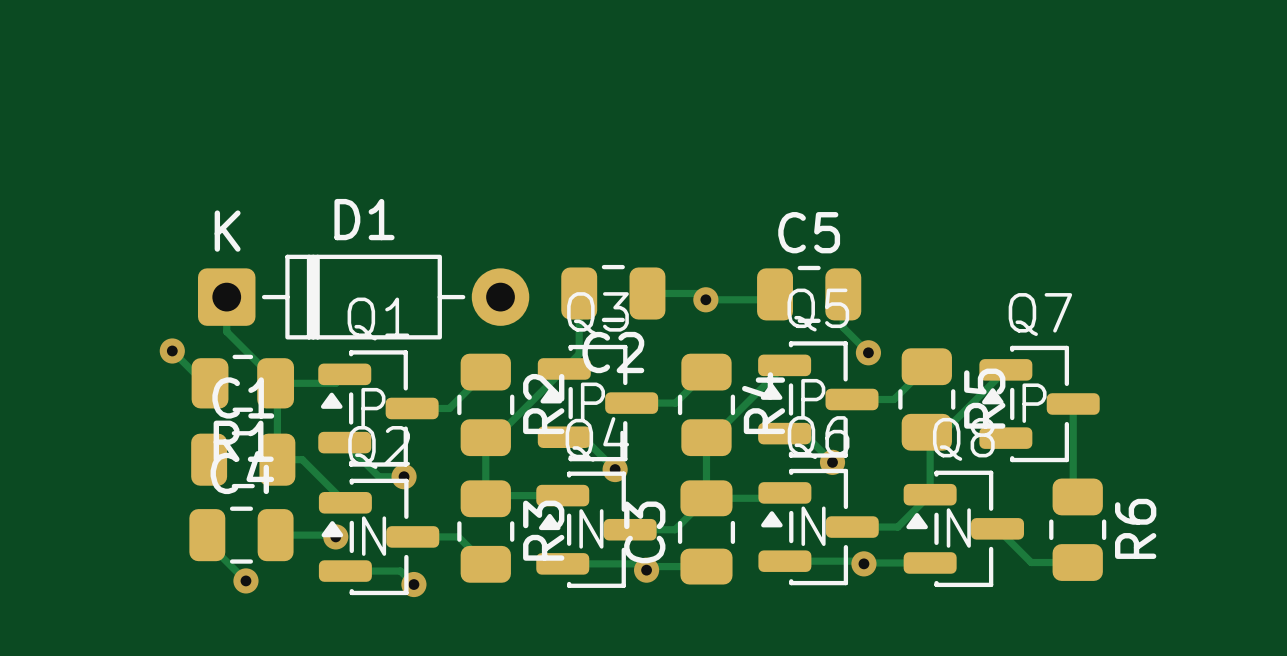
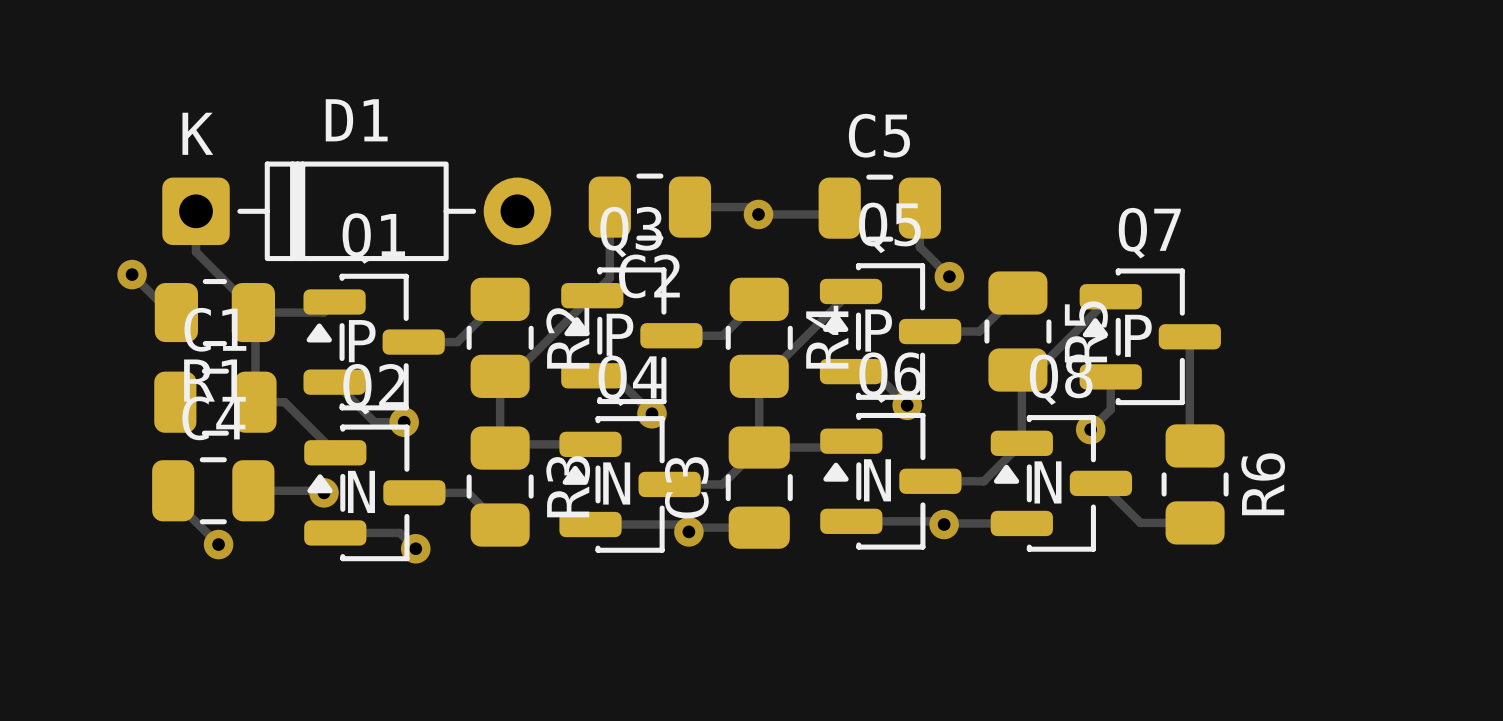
track: none -> (1110, 376) (1110, 409) (1090, 429)
via: none -> (1090, 429)

